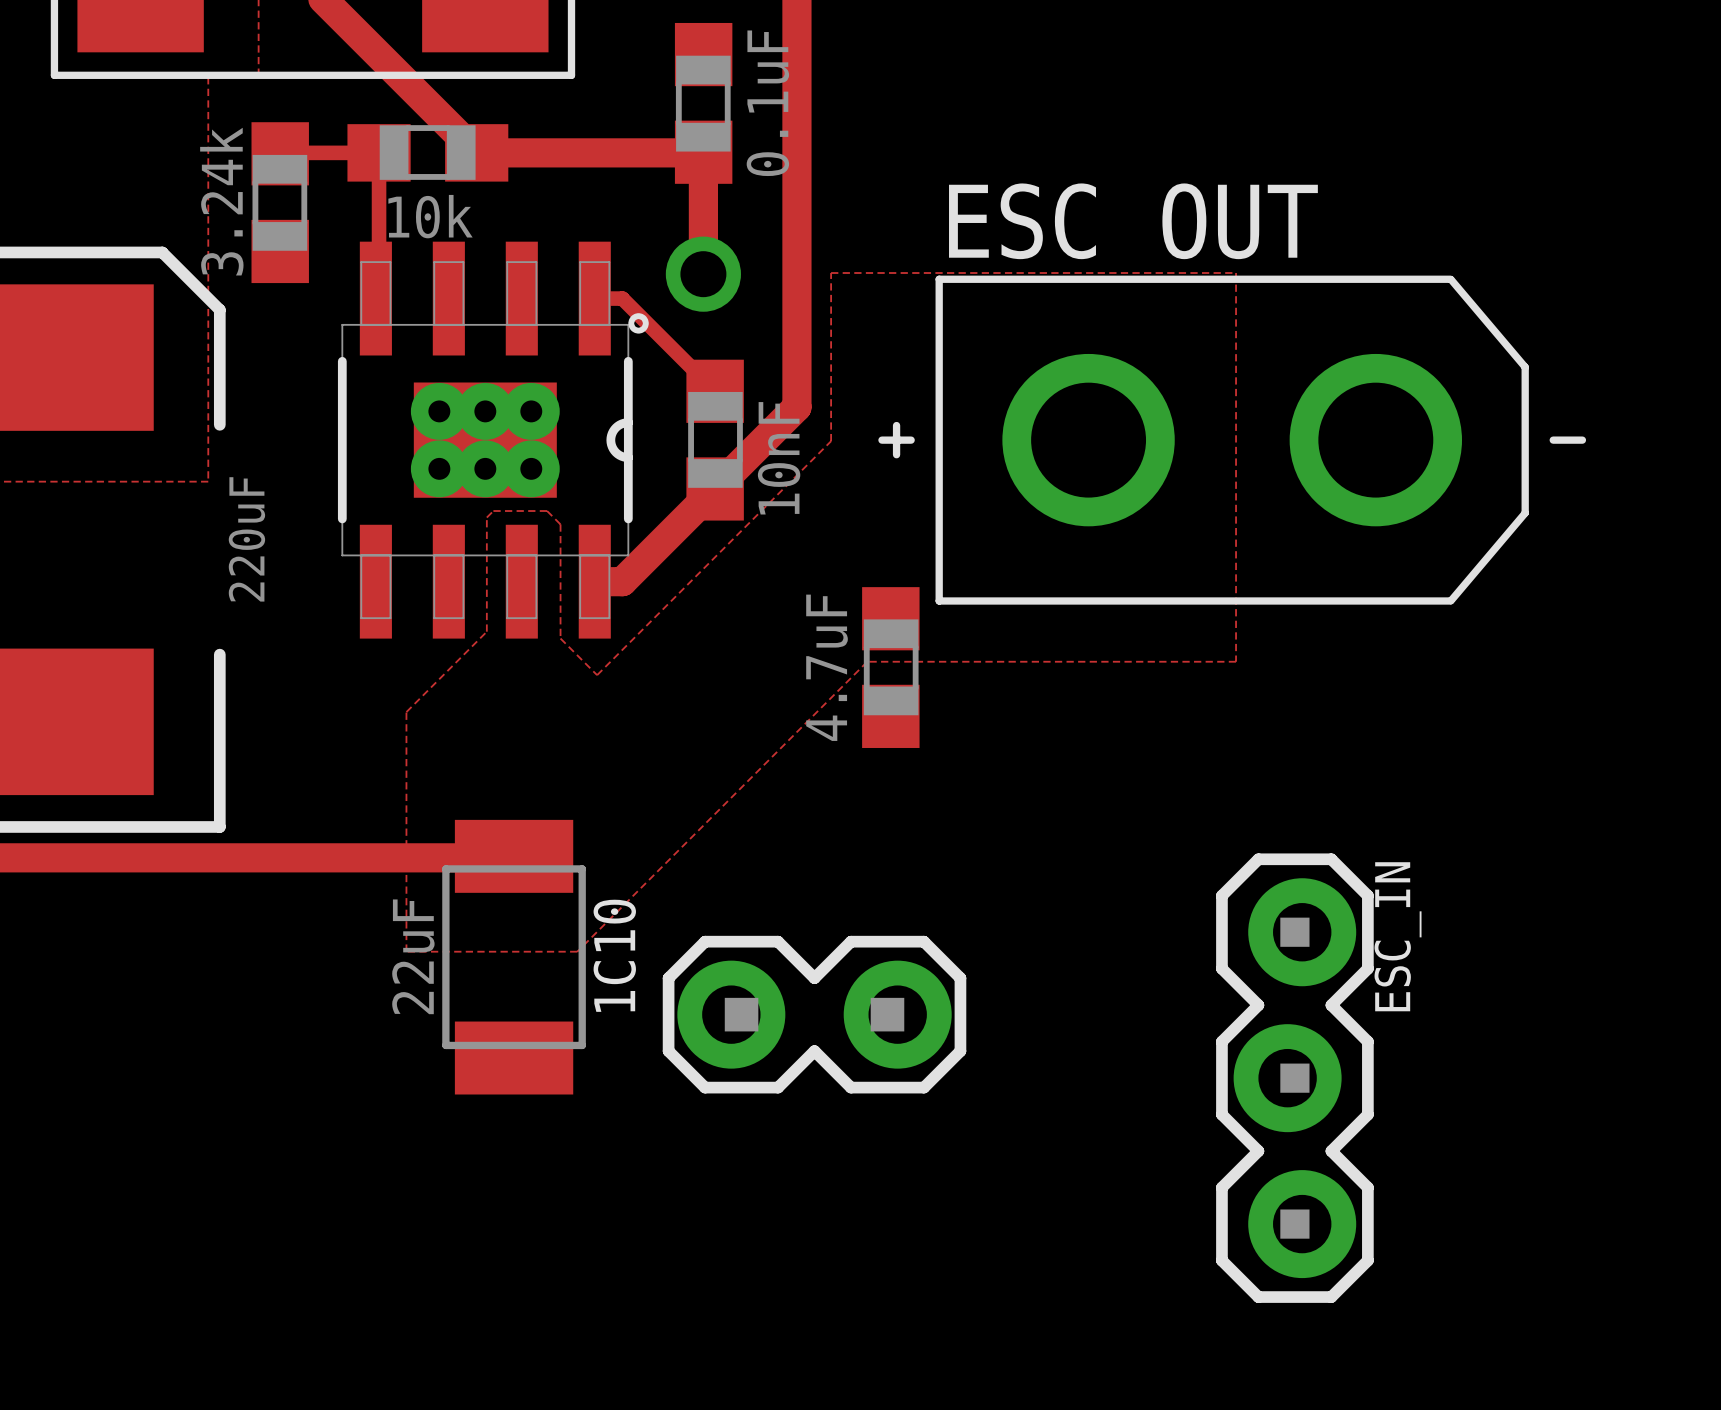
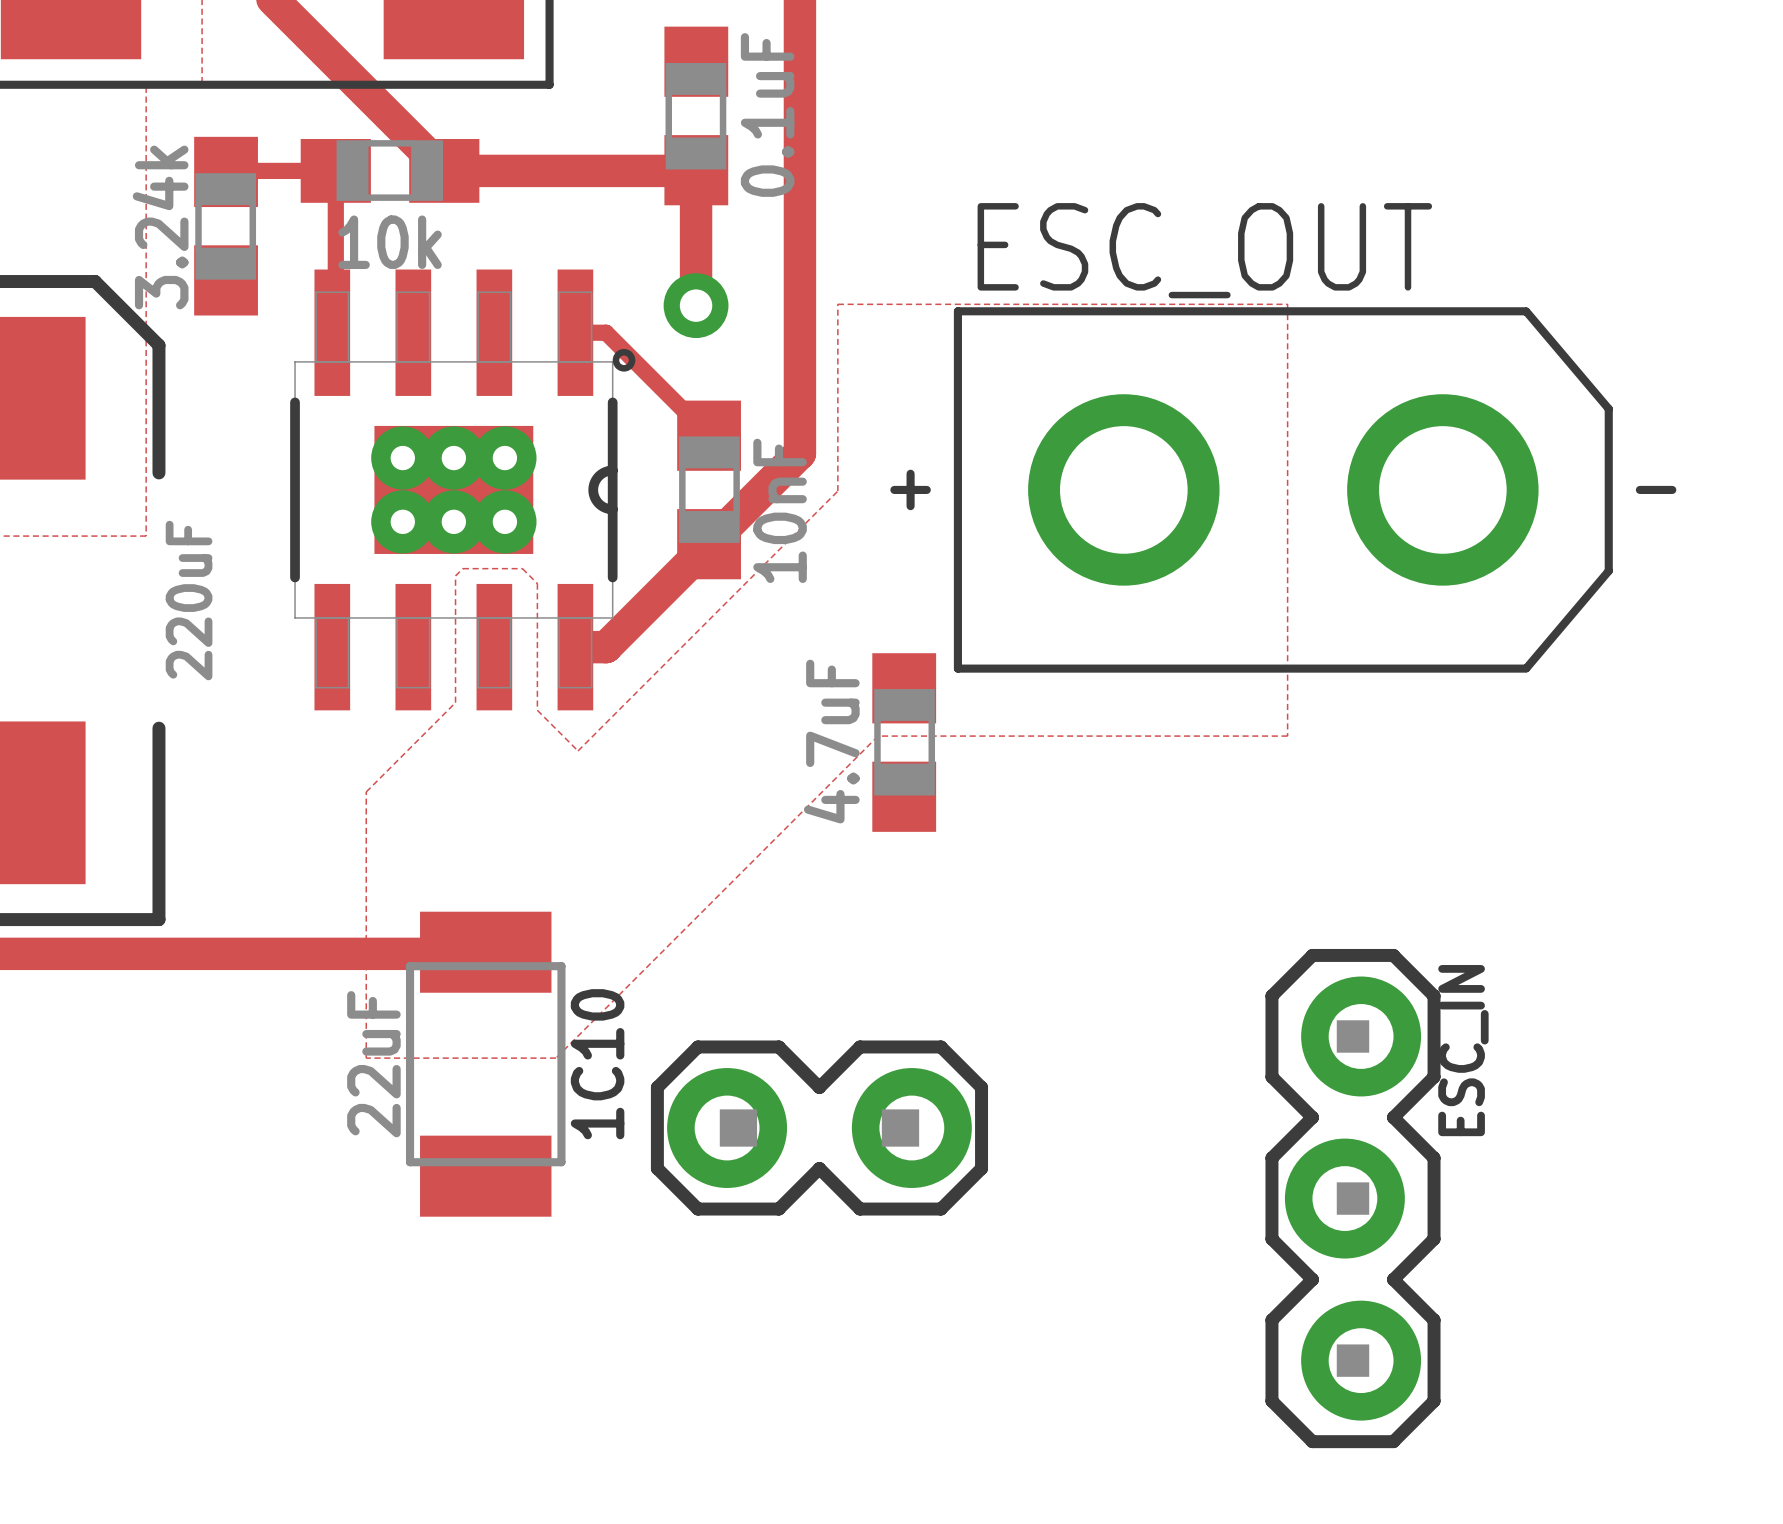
via size: [665, 236, 741, 312] -> [663, 273, 729, 339]

